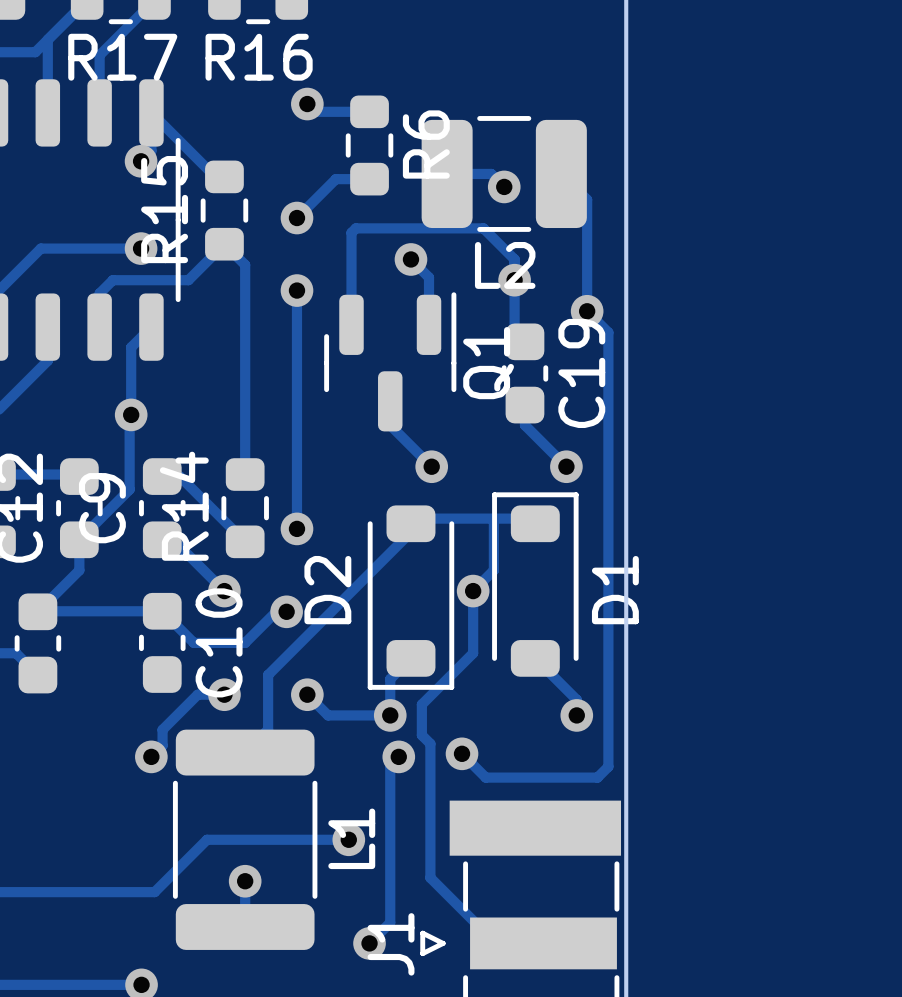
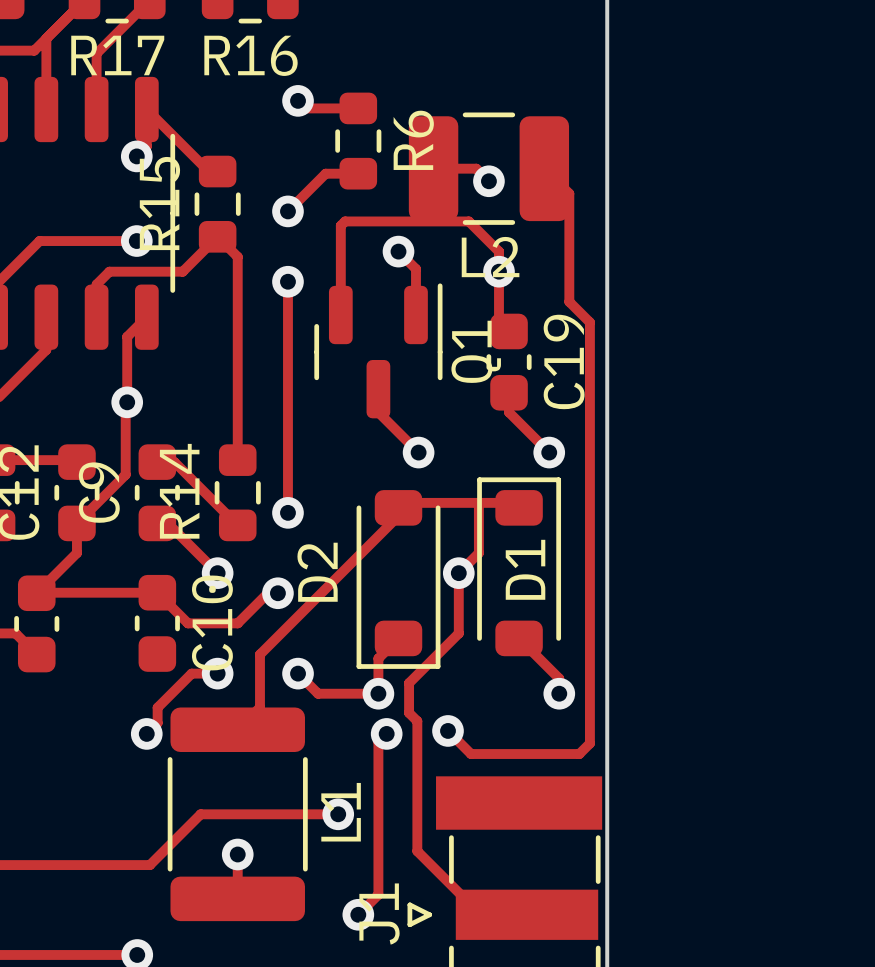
via: (587, 311) -> none
D1 name position: D1 (615, 590) -> D1 (525, 569)

